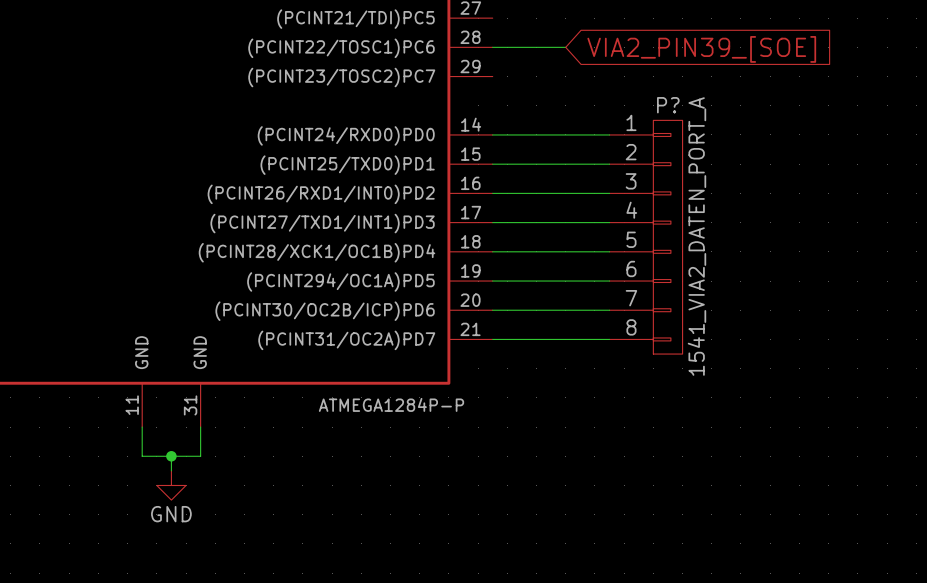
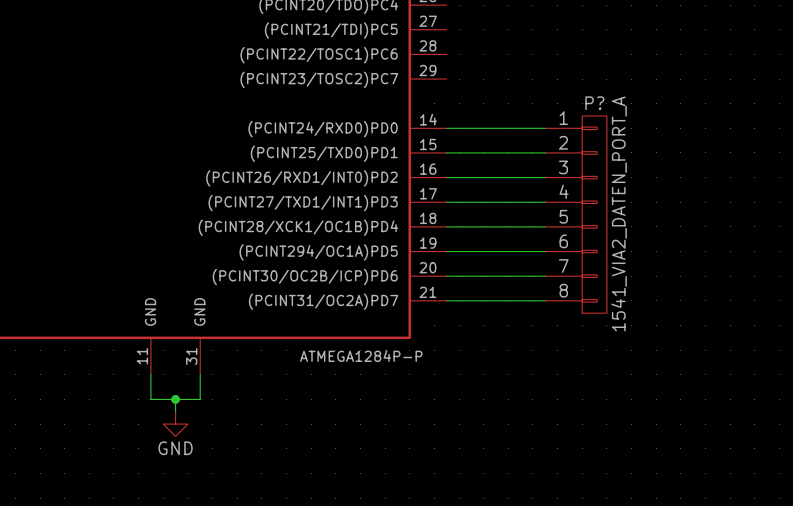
wire: (492, 47) (565, 47) -> none
global label: VIA2_PIN39_[SOE] (701, 49) -> none

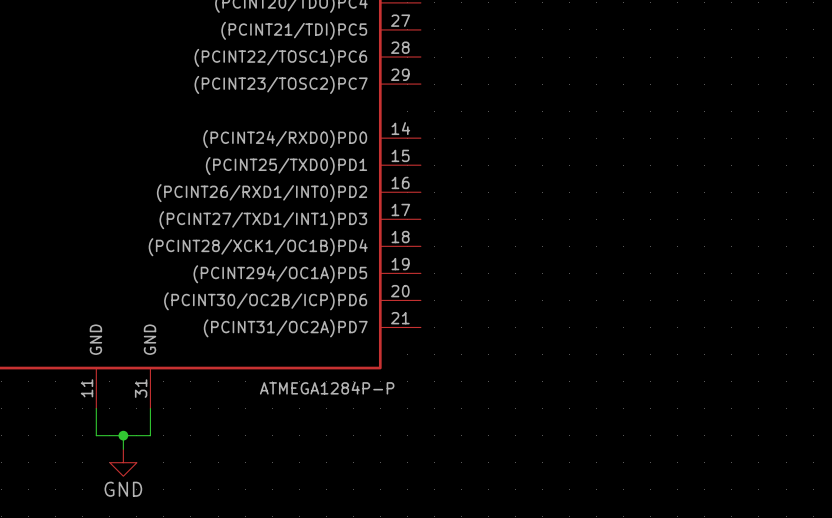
wire: (446, 128) (545, 128) -> none
wire: (446, 152) (545, 152) -> none
wire: (446, 177) (545, 177) -> none
wire: (446, 202) (545, 202) -> none
P?: 1541_VIA2_DATEN_PORT_A (576, 214) -> none
wire: (446, 226) (545, 226) -> none
wire: (446, 251) (545, 251) -> none
wire: (446, 276) (545, 276) -> none
wire: (446, 300) (545, 300) -> none

